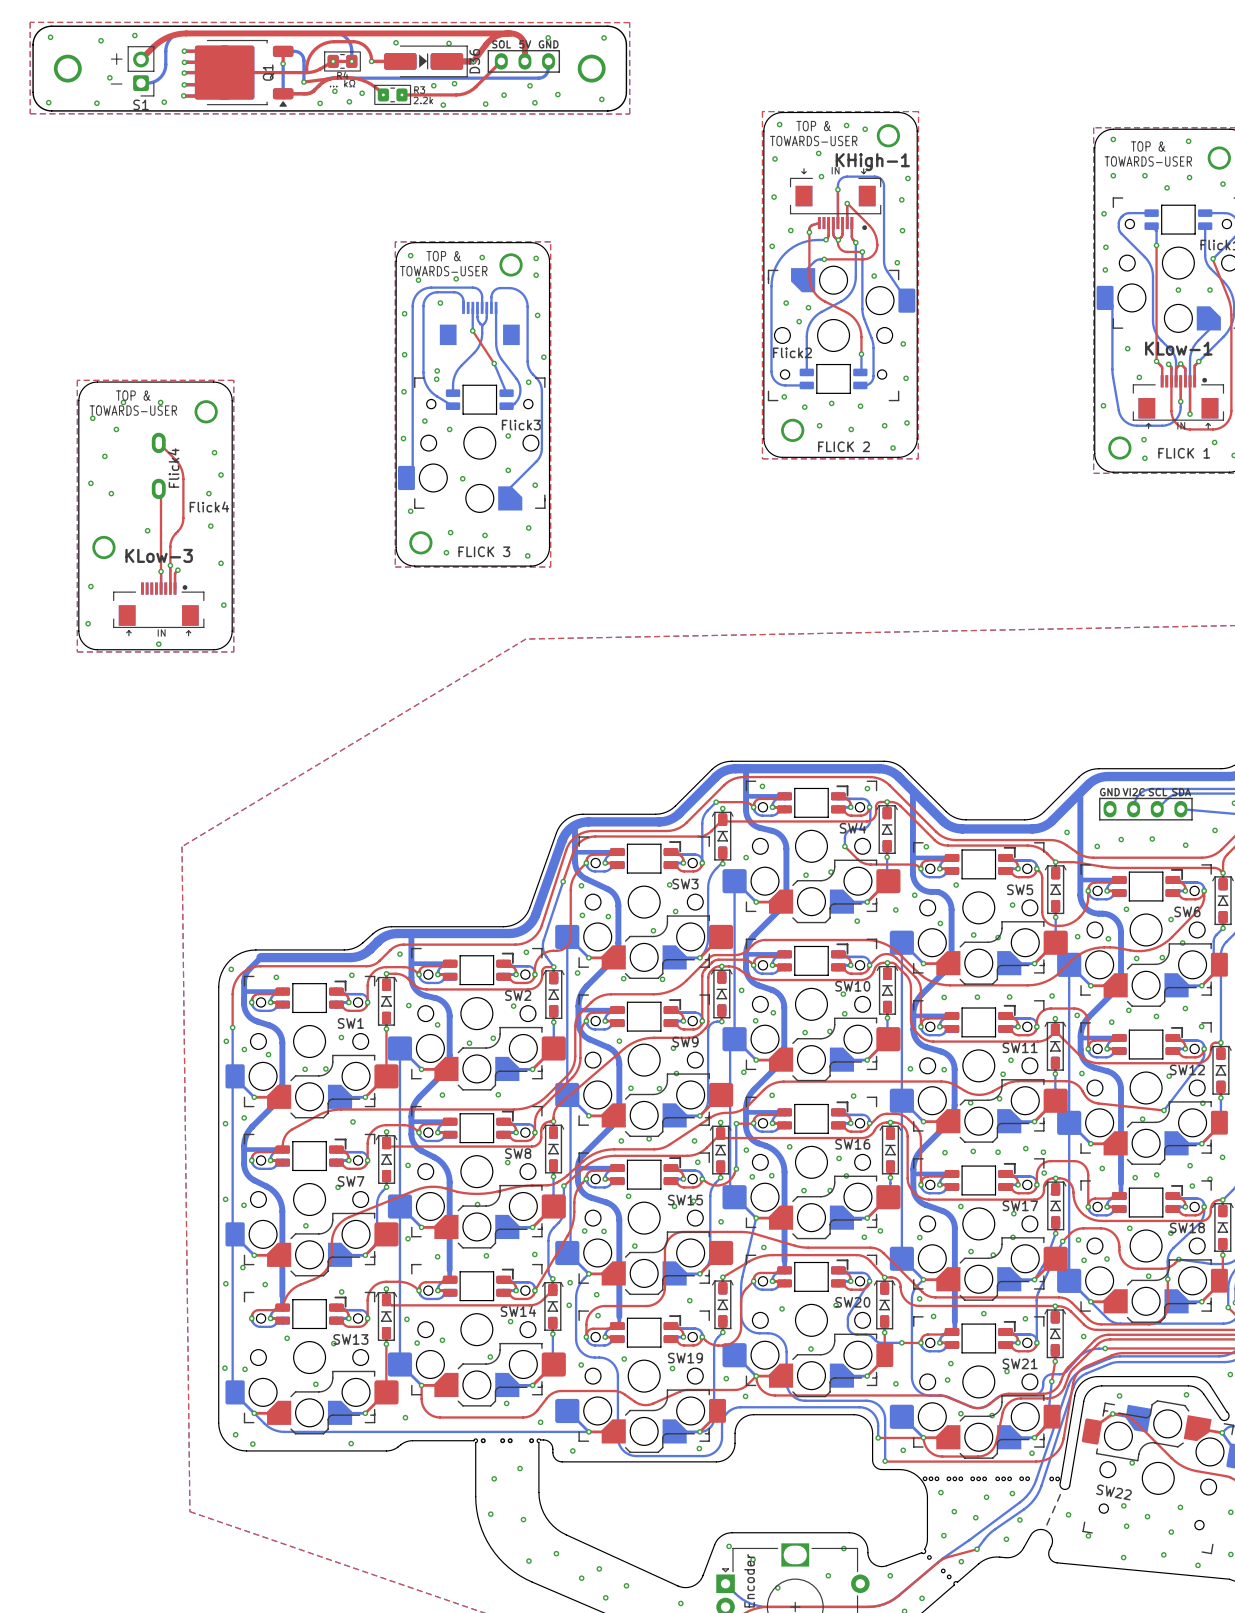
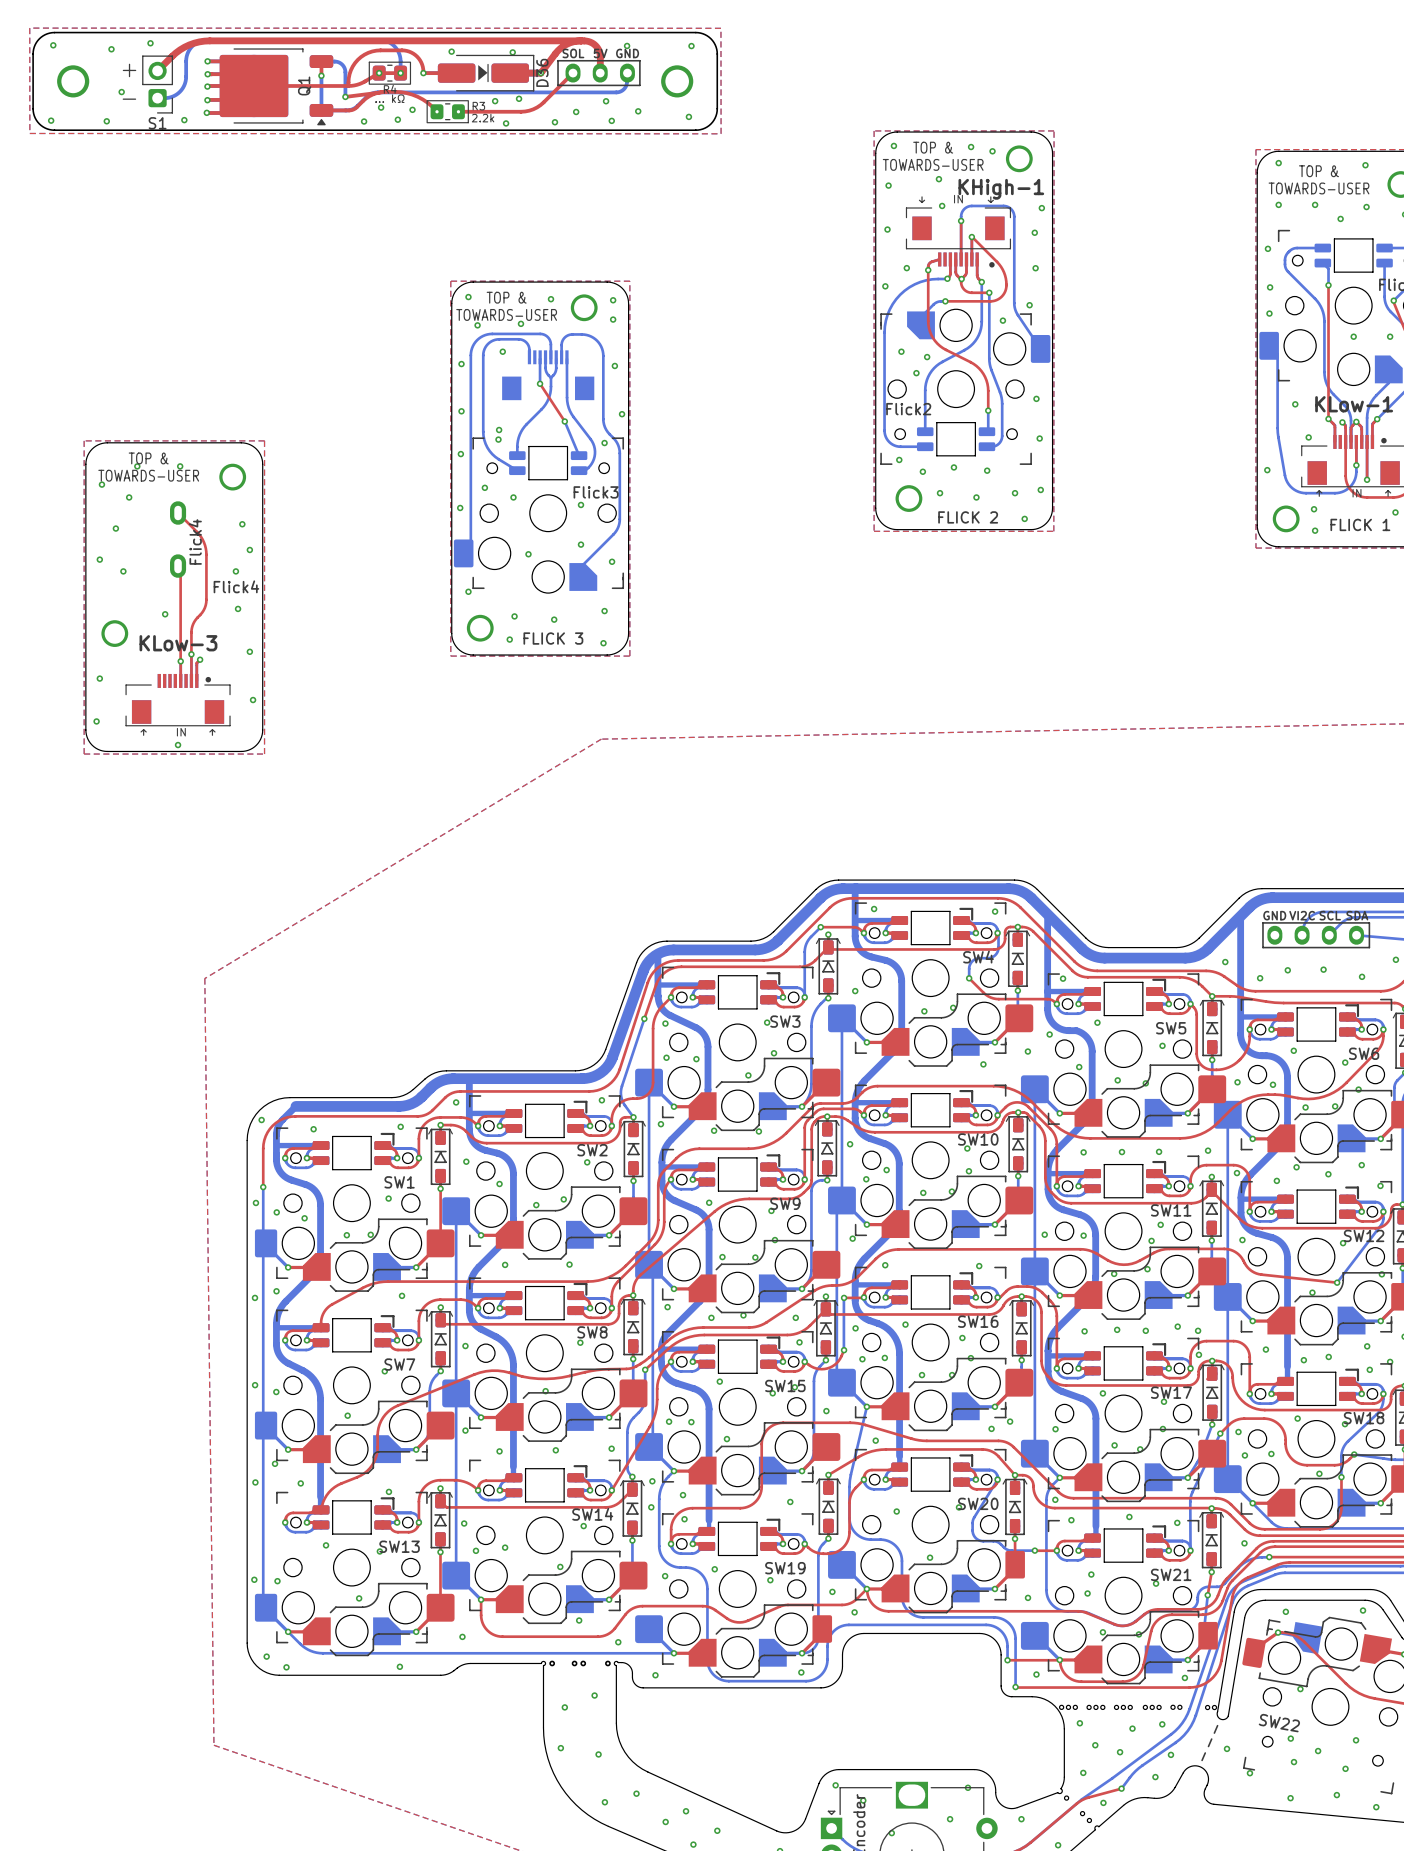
via: none -> (667, 1307)

